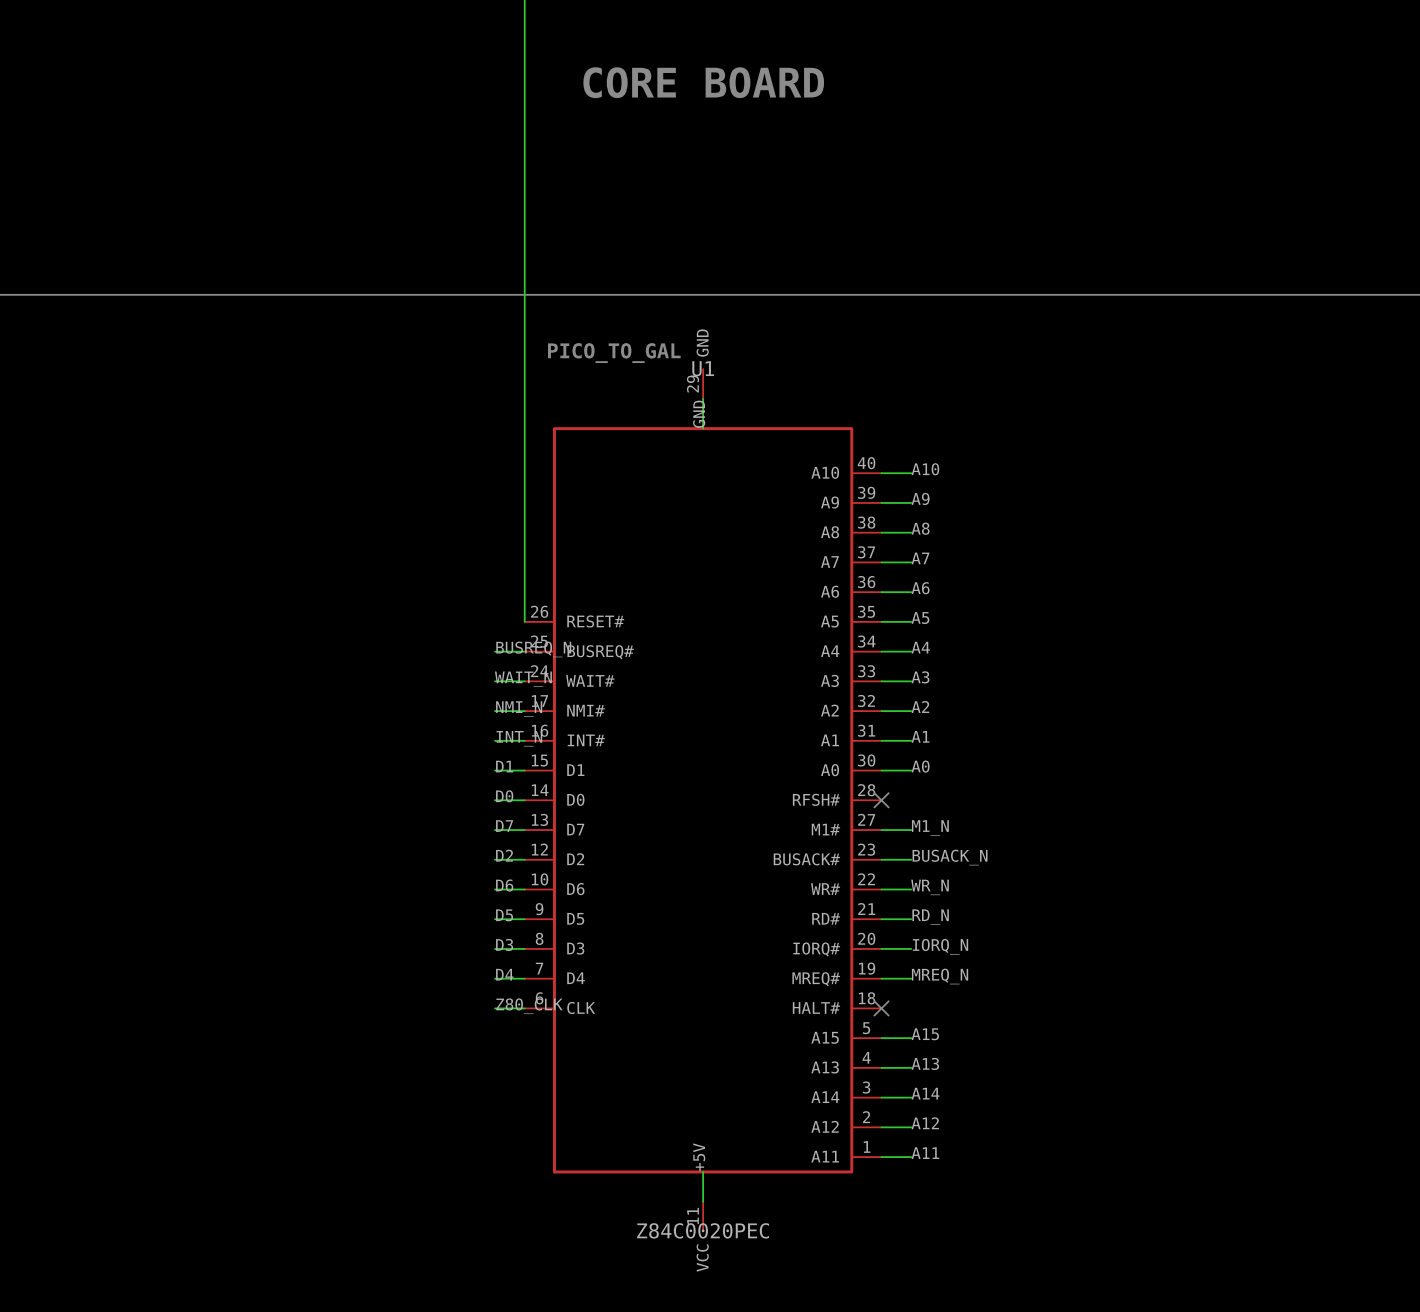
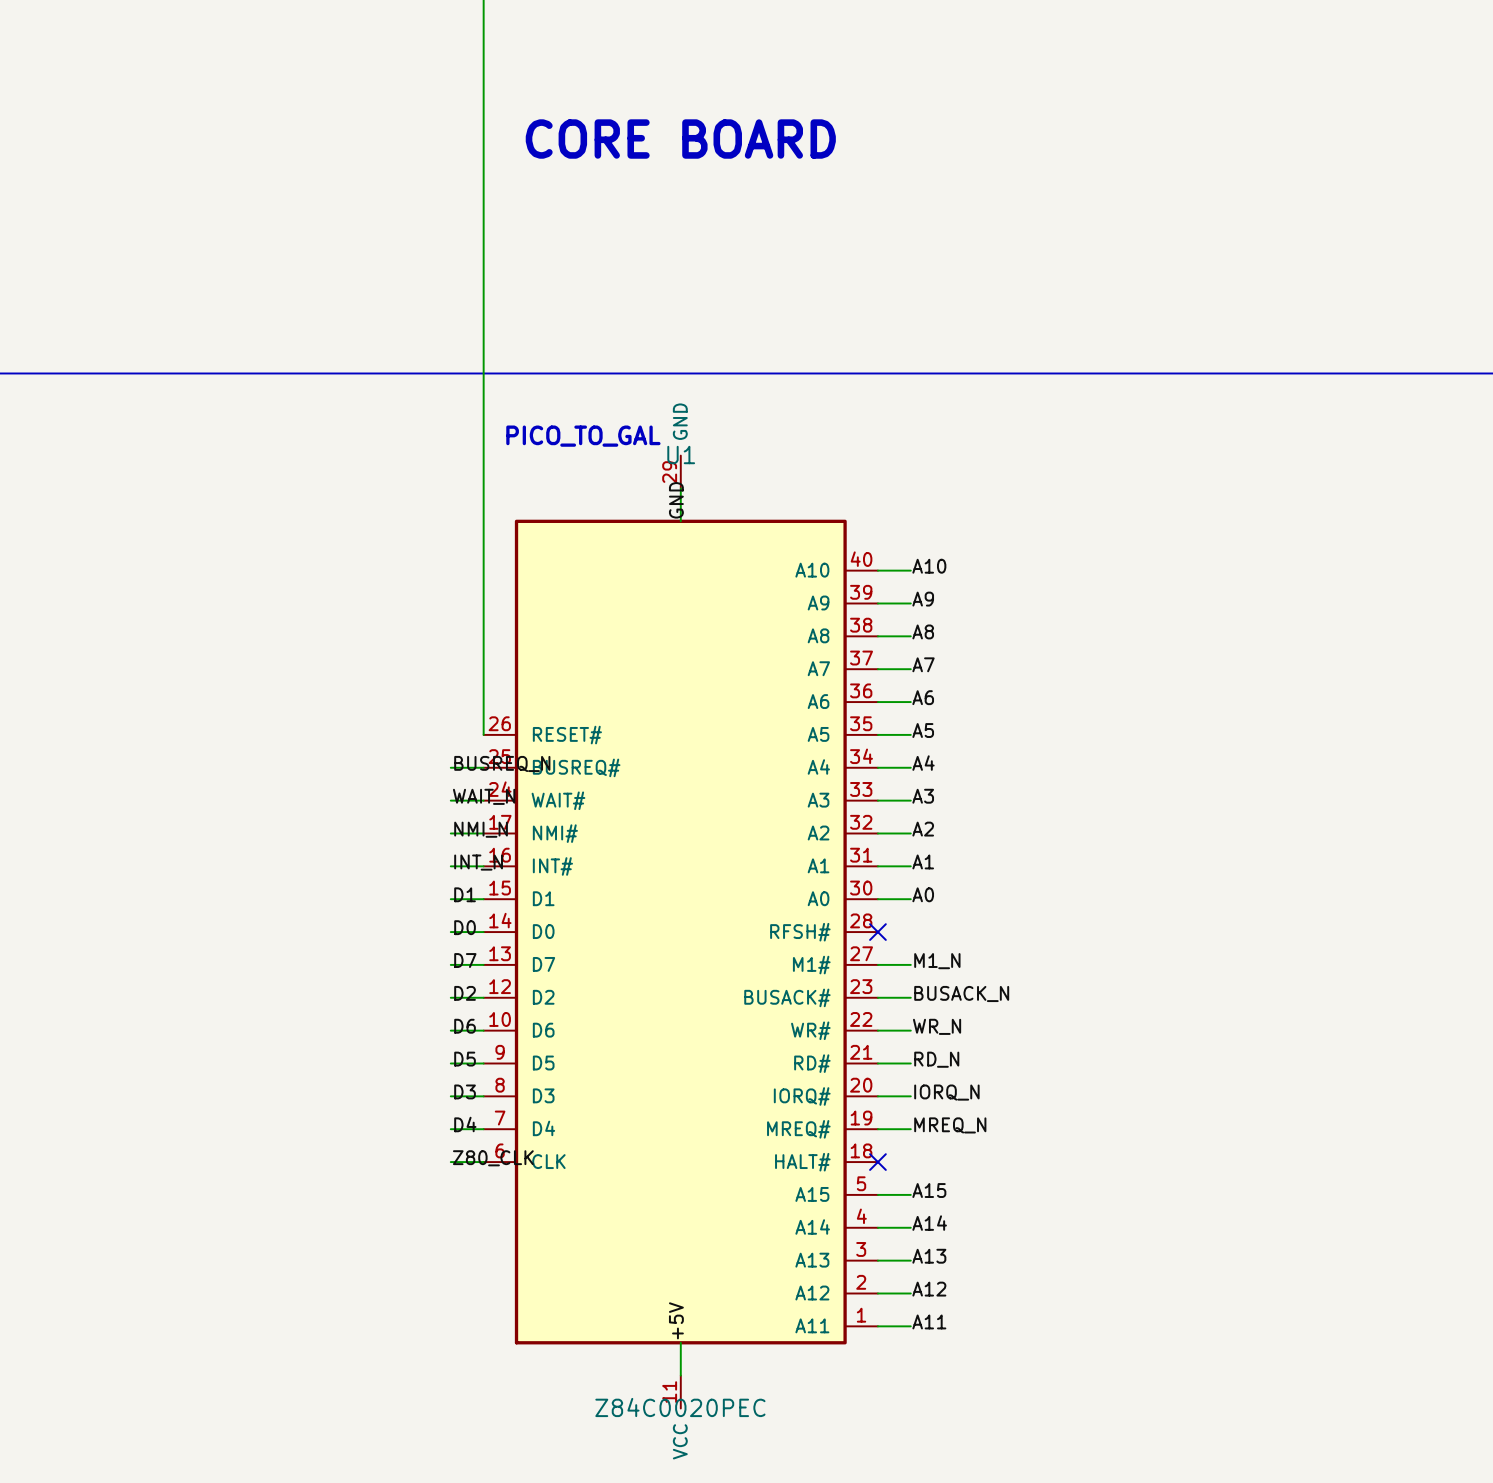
label: A13 (925, 1063) -> A14 (929, 1223)
U1 pin name: A13 (825, 1067) -> A14 (812, 1226)
label: A14 (925, 1093) -> A13 (929, 1256)
U1 pin name: A14 (825, 1097) -> A13 (812, 1260)

